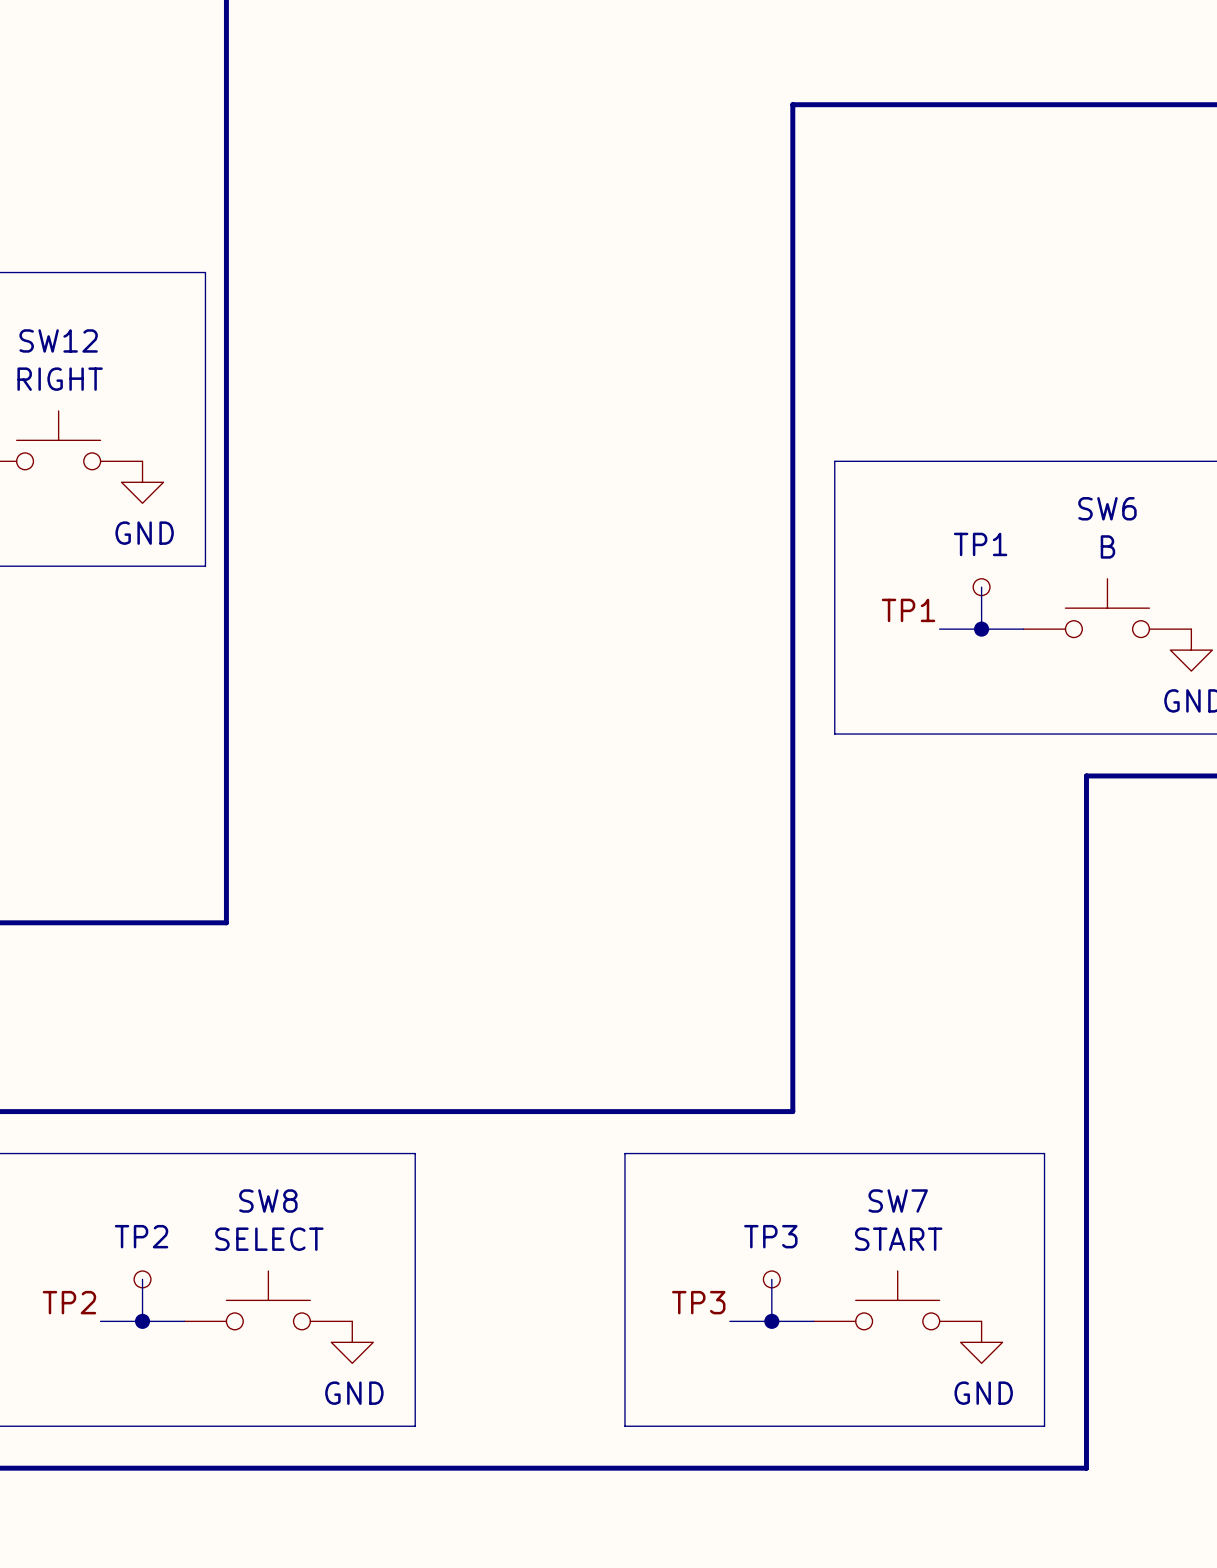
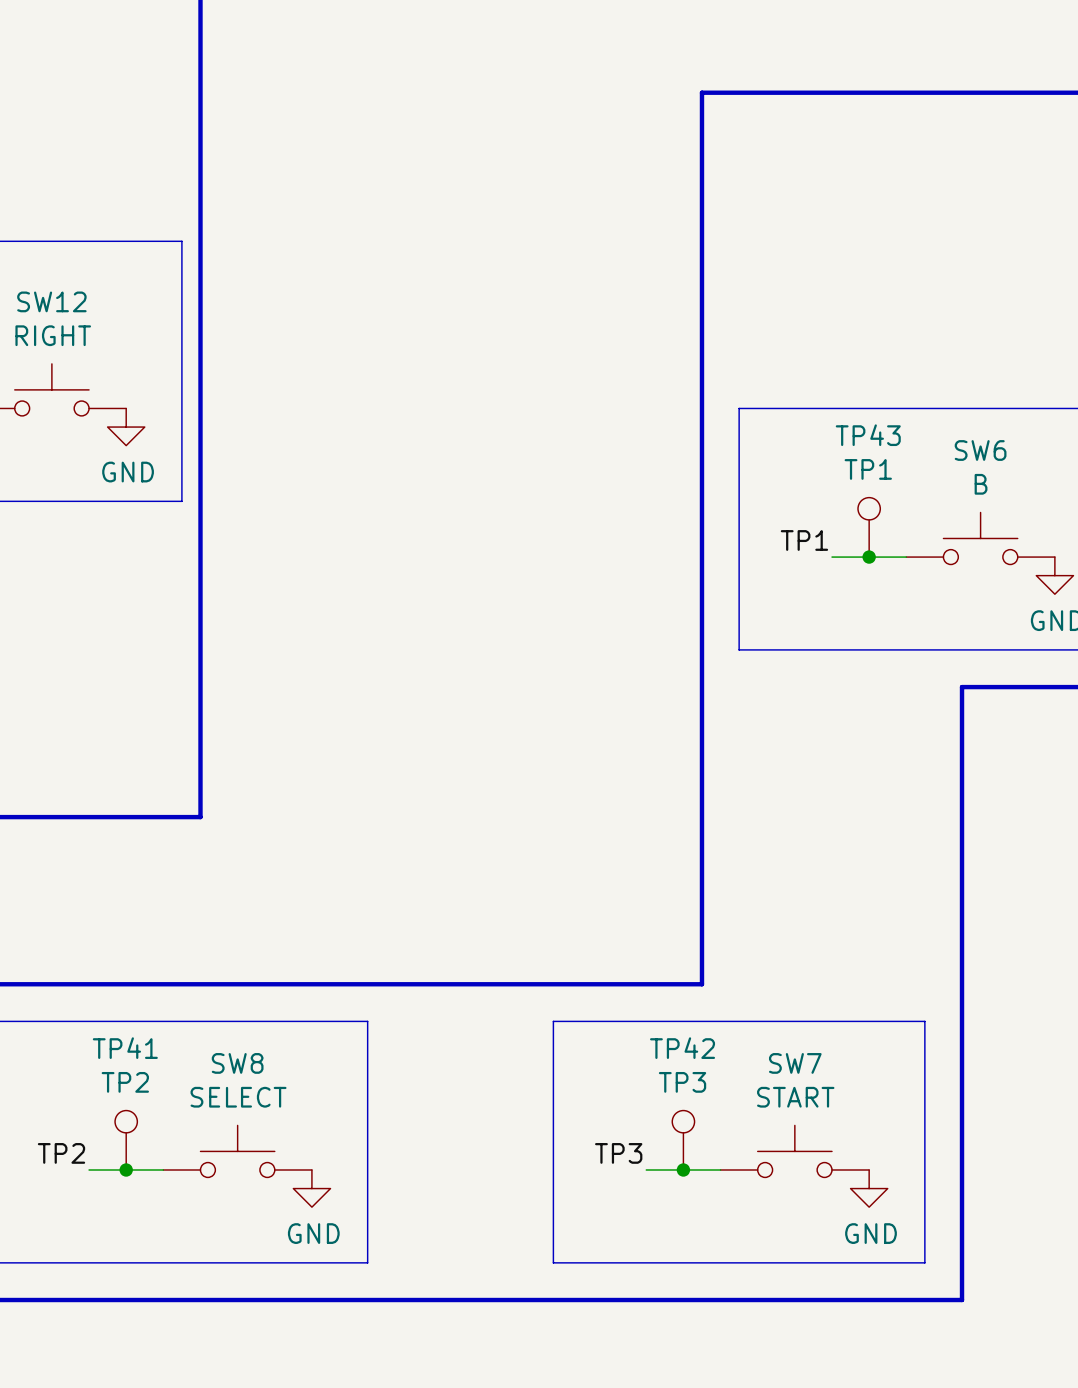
part: TP1 (981, 587) -> none
TP43: none -> TP1 (869, 527)
part: TP2 (142, 1279) -> none
part: TP3 (771, 1279) -> none
TP41: none -> TP2 (126, 1140)
TP42: none -> TP3 (683, 1140)

